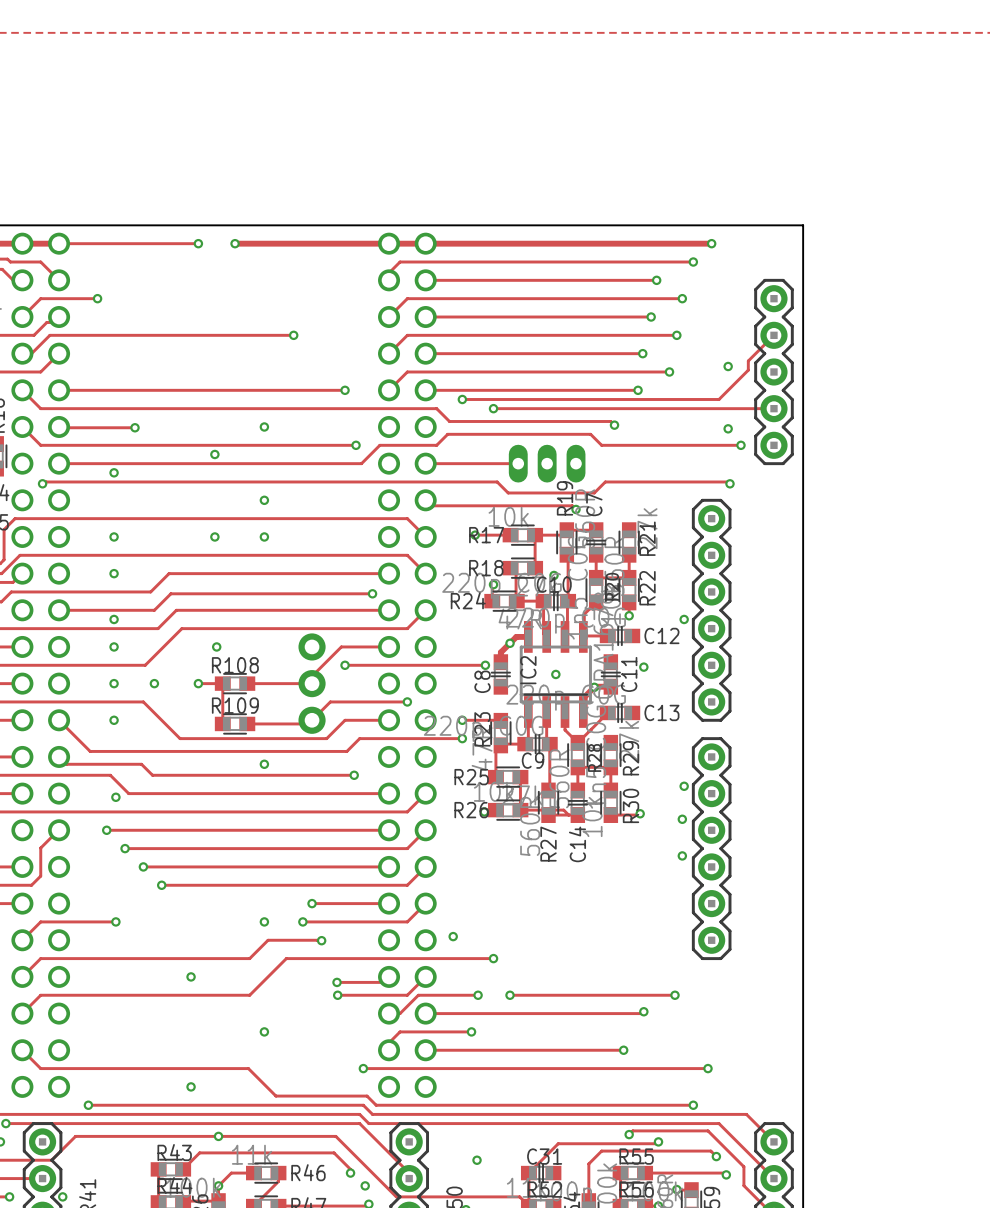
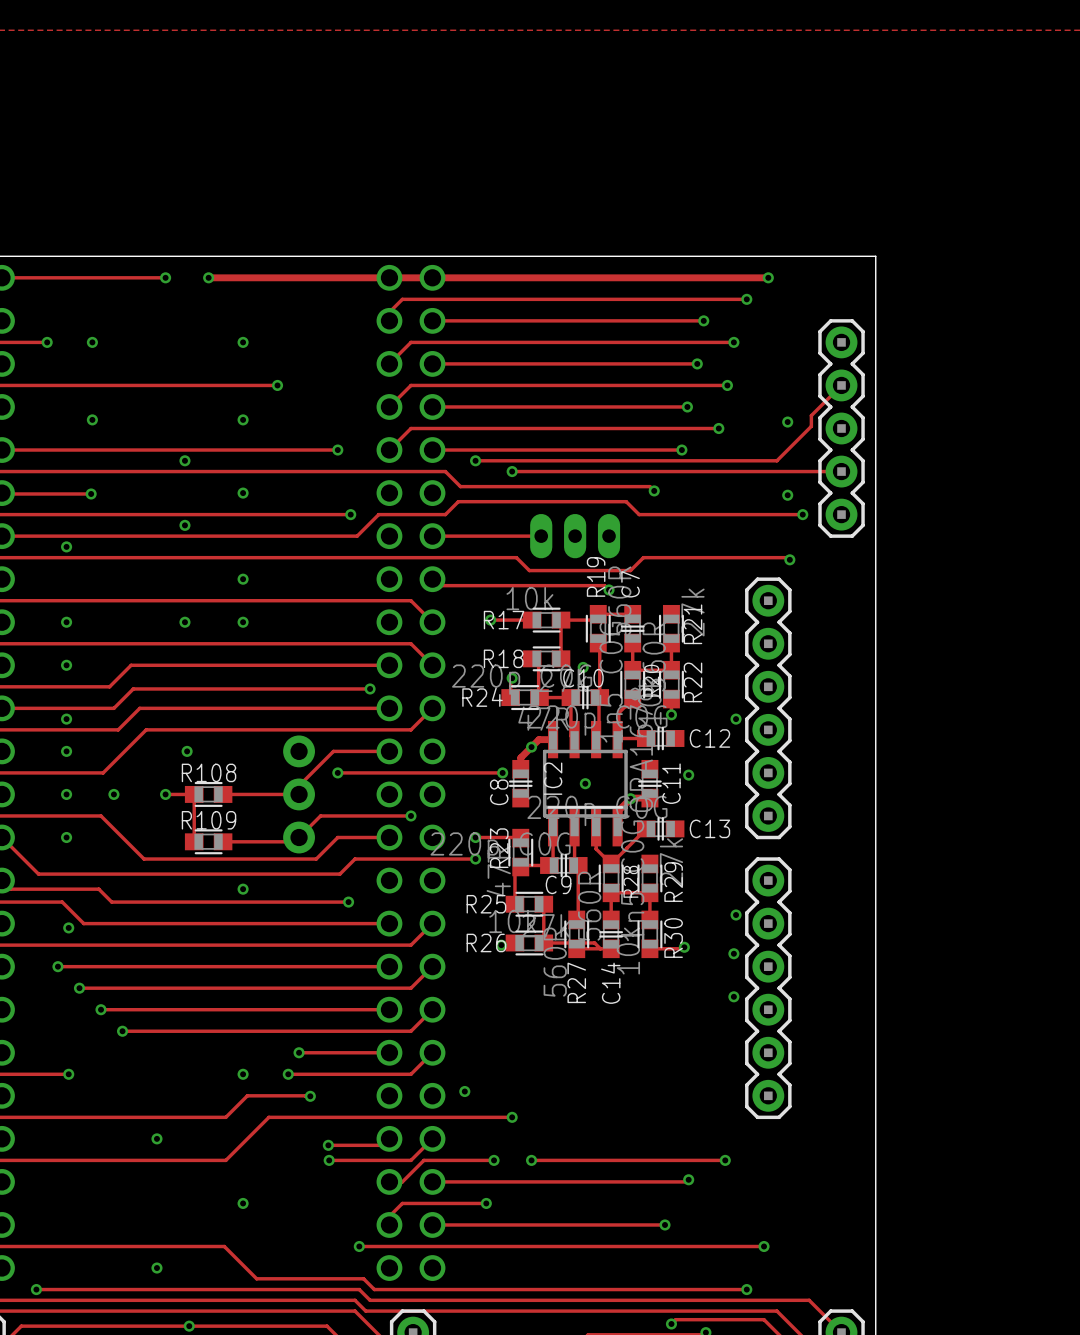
via: none -> (92, 342)
via: none -> (243, 342)
via: none -> (92, 419)
via: none -> (243, 419)
via: none -> (184, 460)

